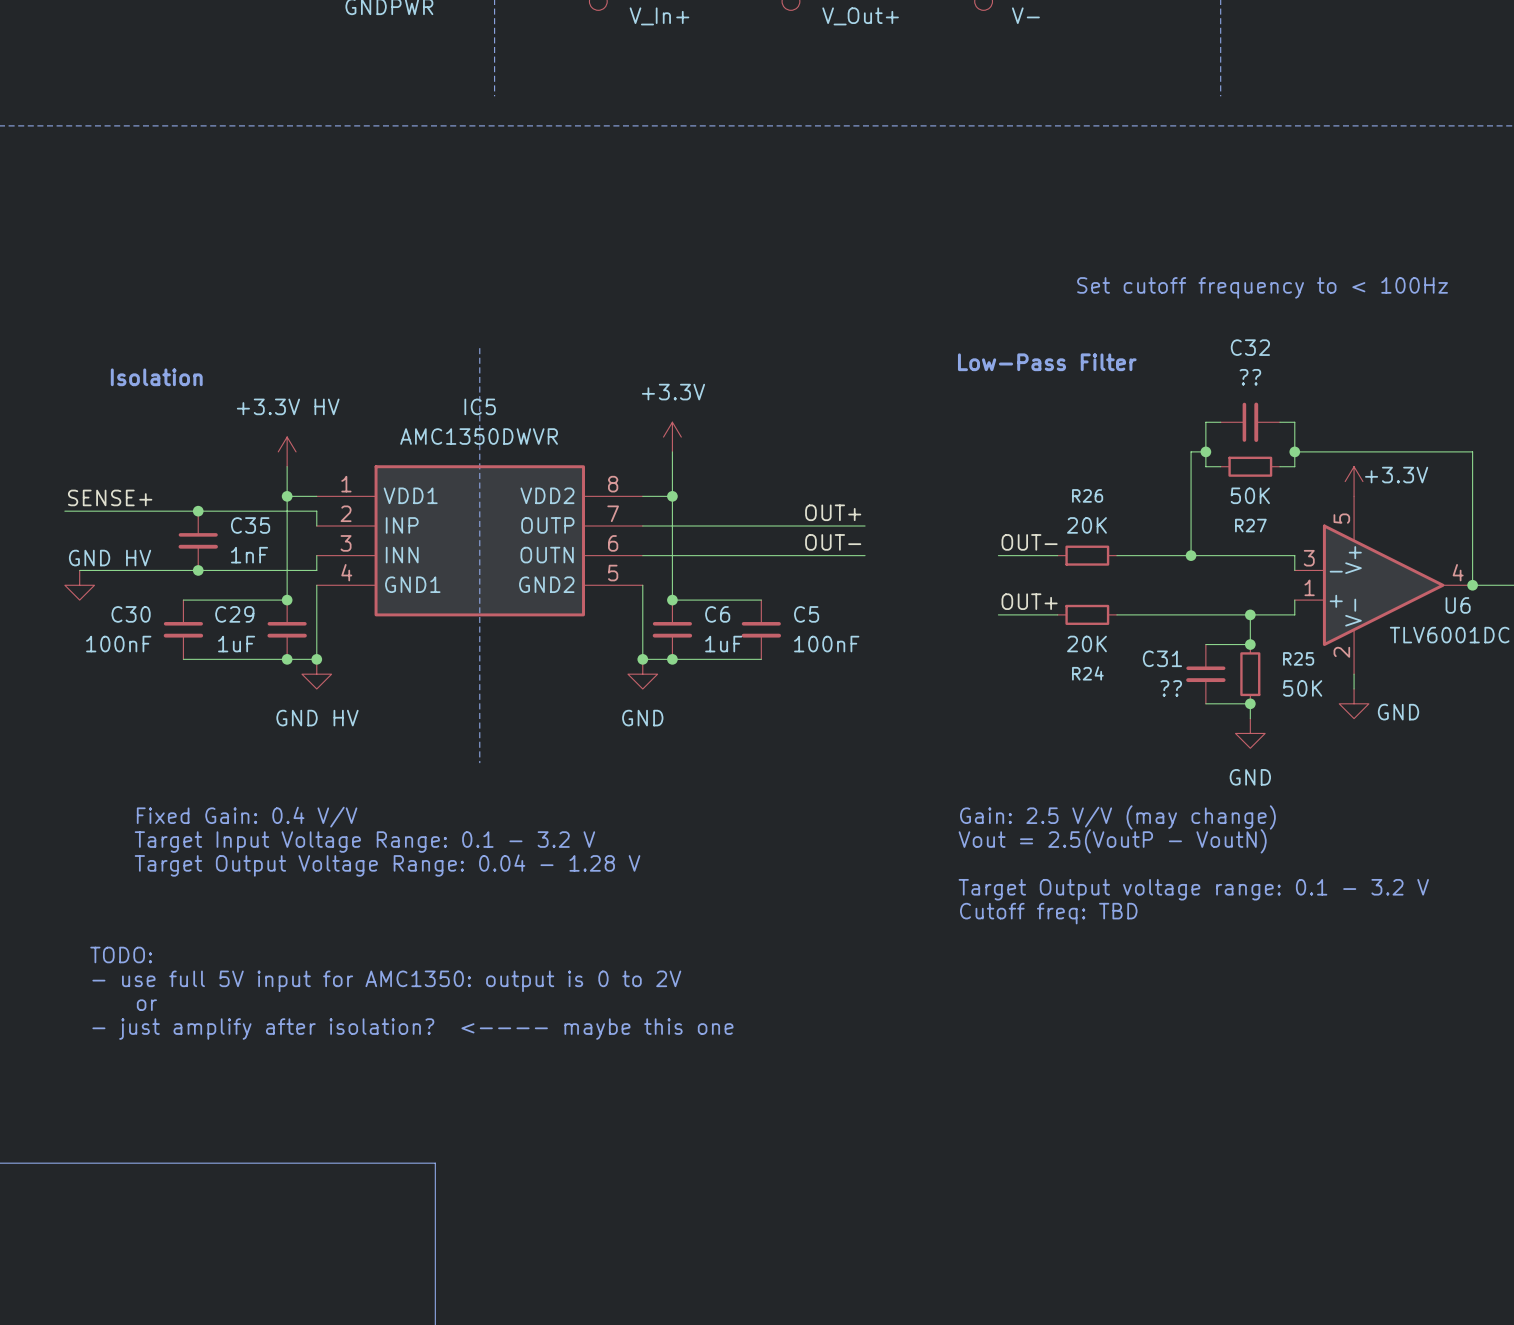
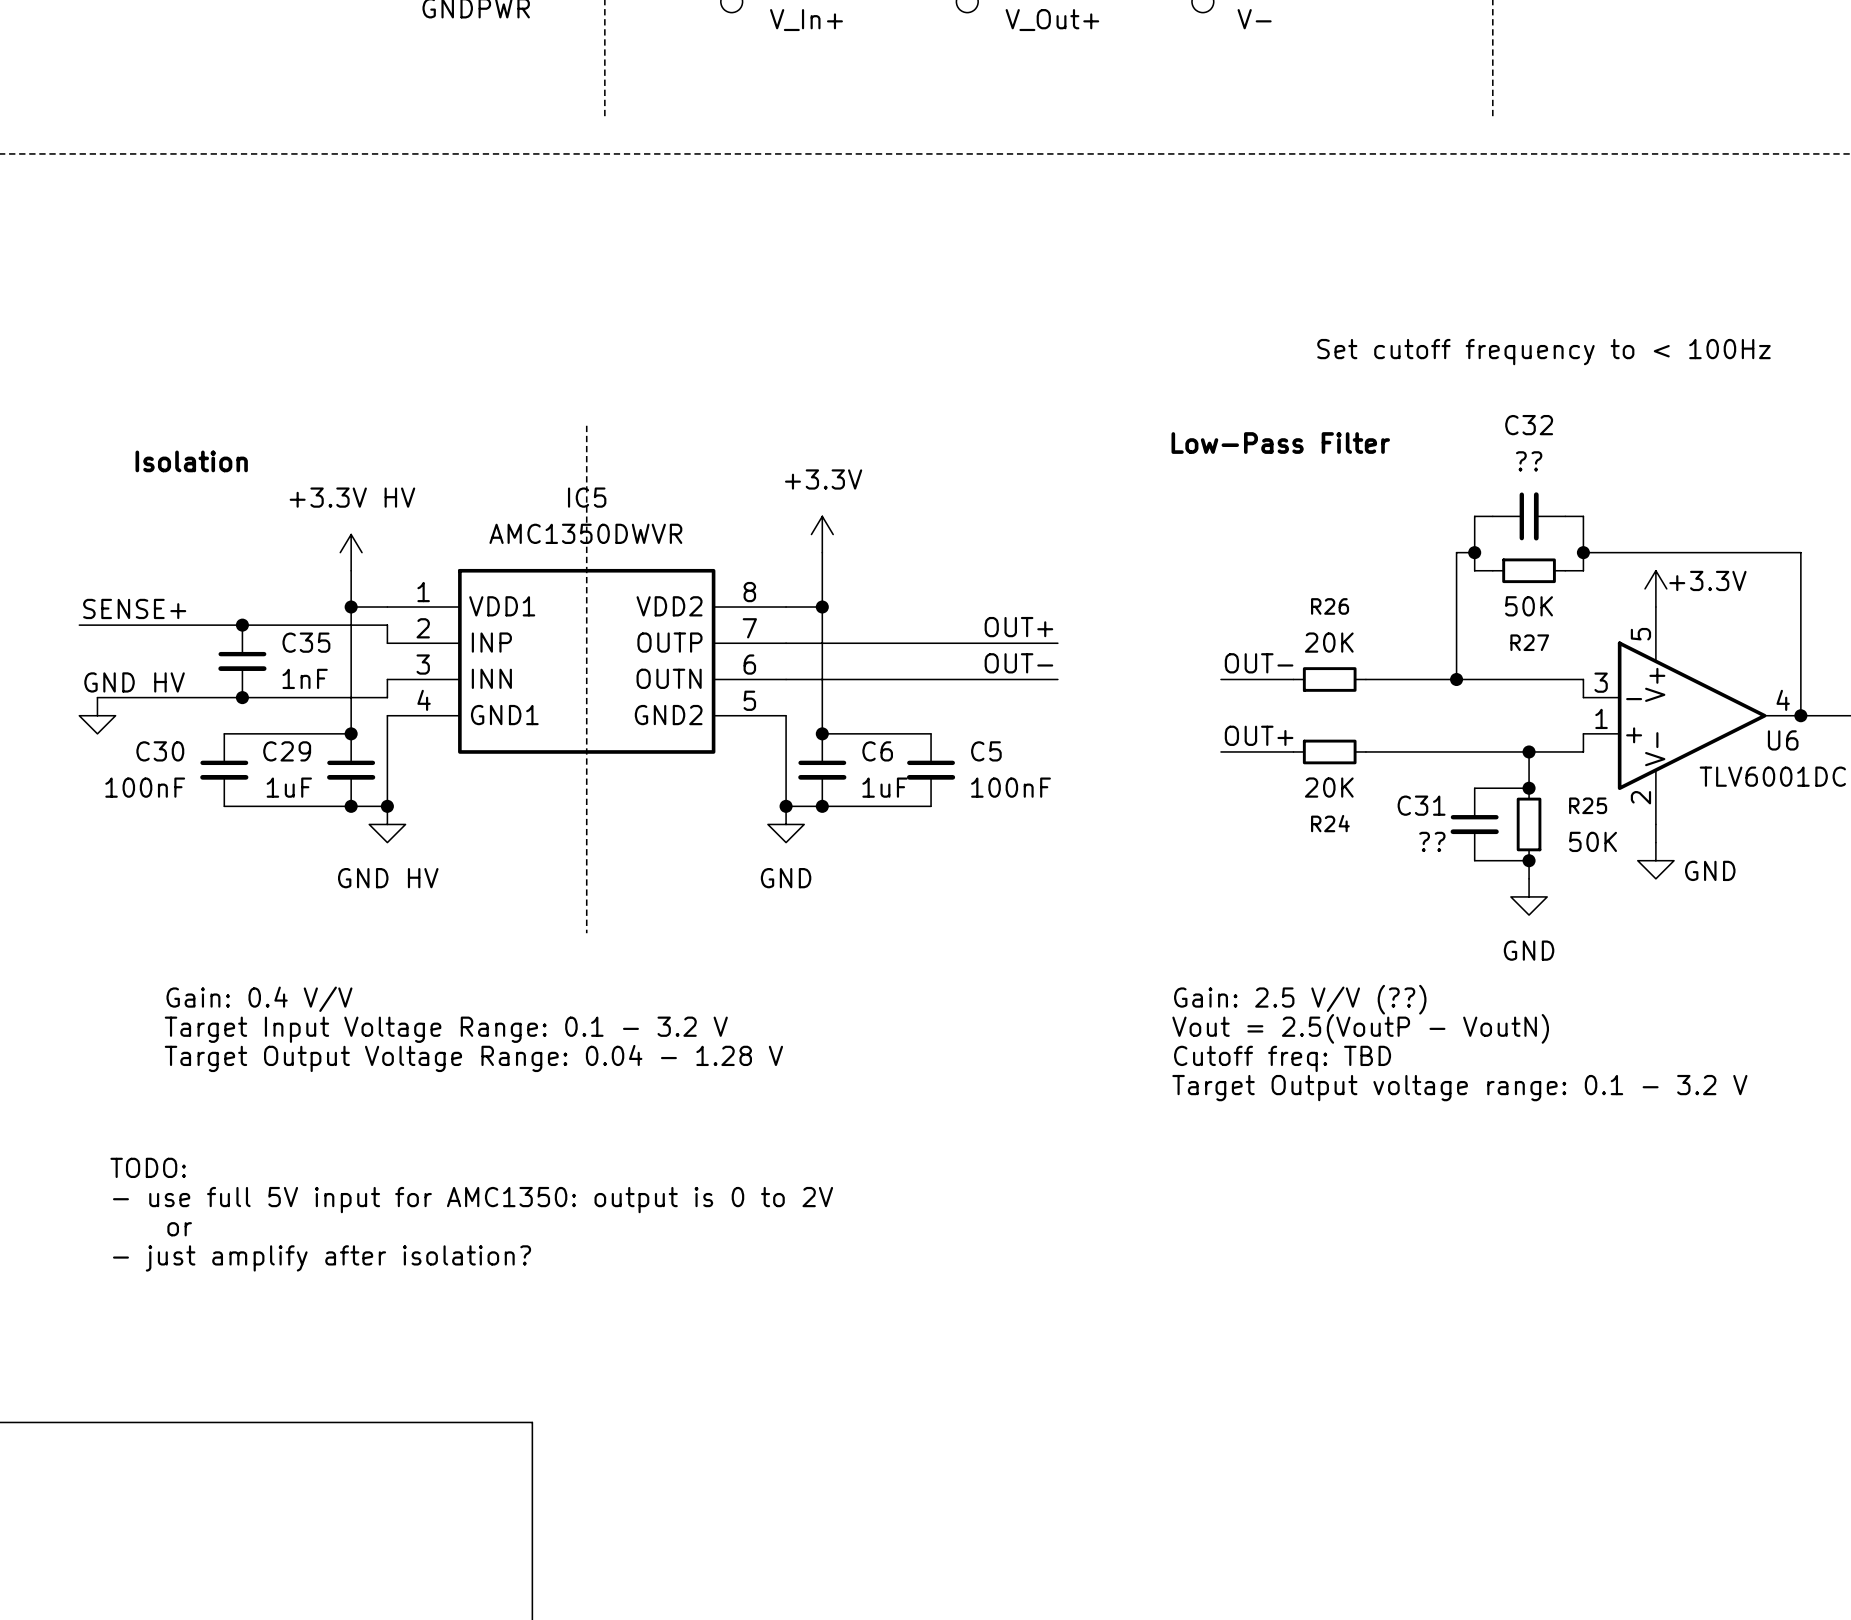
text: Fixed Gain: 0.4 V/V (247, 817) -> Gain: 0.4 V/V (259, 999)
text: Gain: 2.5 V/V (may change) (1117, 817) -> Gain: 2.5 V/V (??) (1300, 999)
text position: Cutoff freq: TBD (1048, 913) -> Cutoff freq: TBD (1282, 1058)
text: - just amplify after isolation? <---- maybe this one (412, 1029) -> - just amplify after isolation? (322, 1258)

